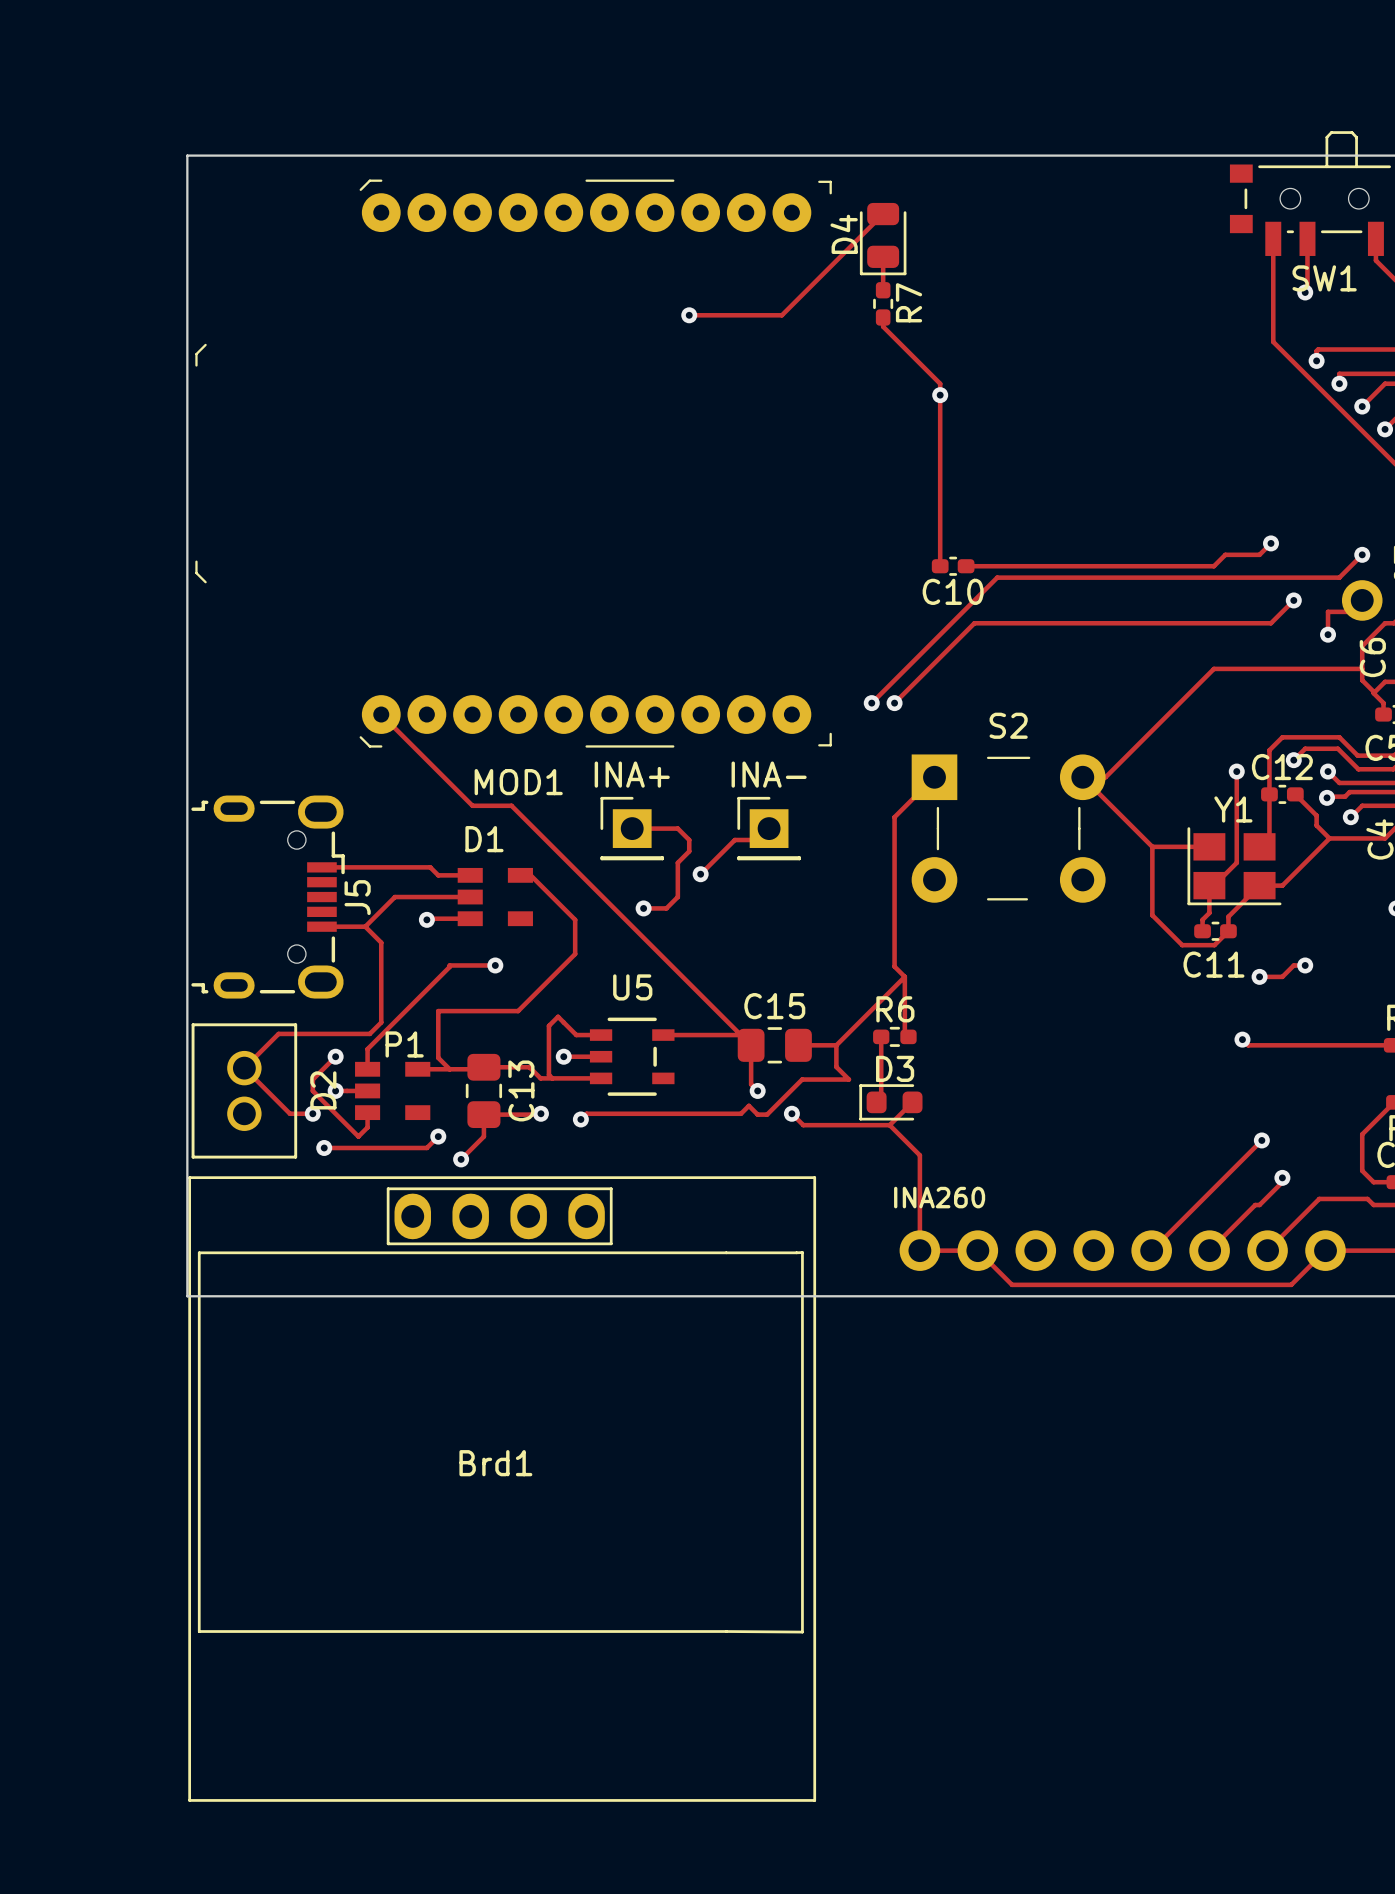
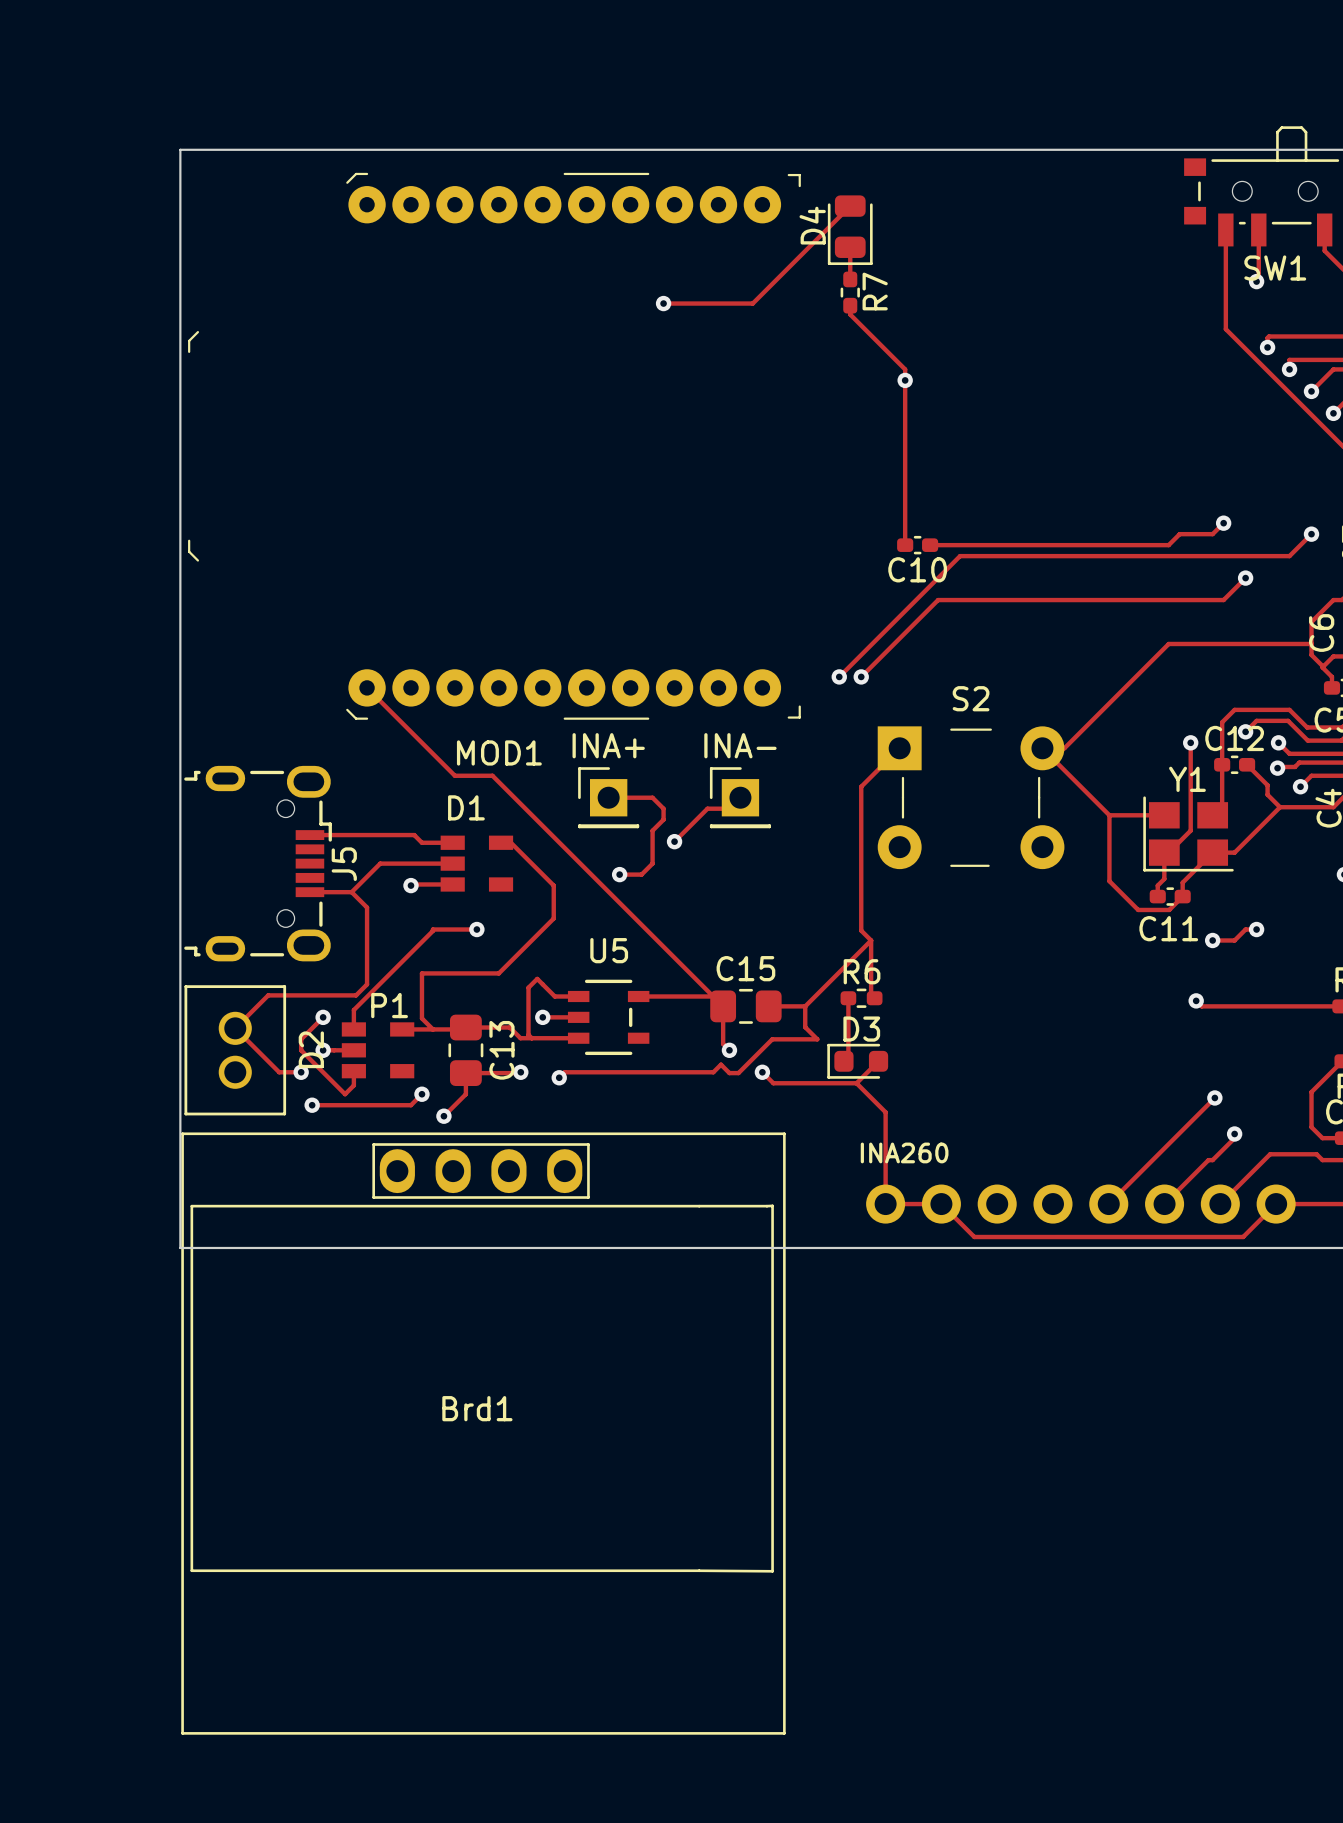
track: (1362, 600) (1350, 611) (1328, 611) (1328, 634) -> none
part: (1362, 600) -> none
via: (1328, 634) -> none

